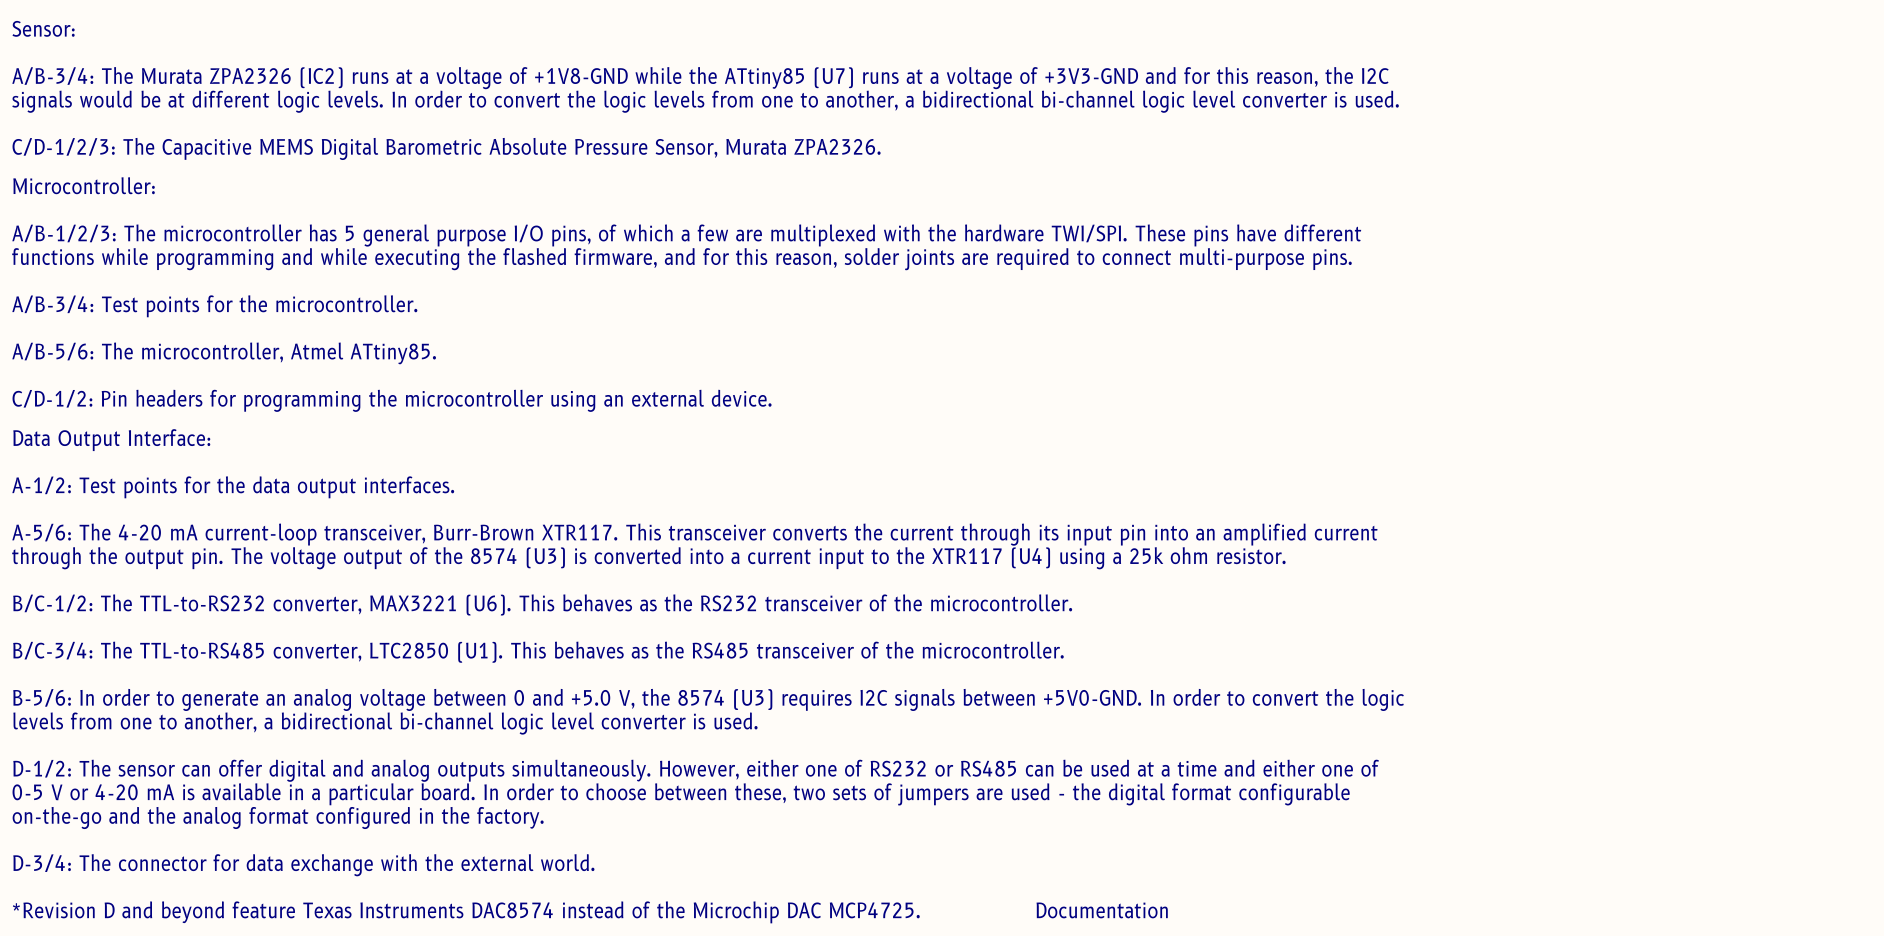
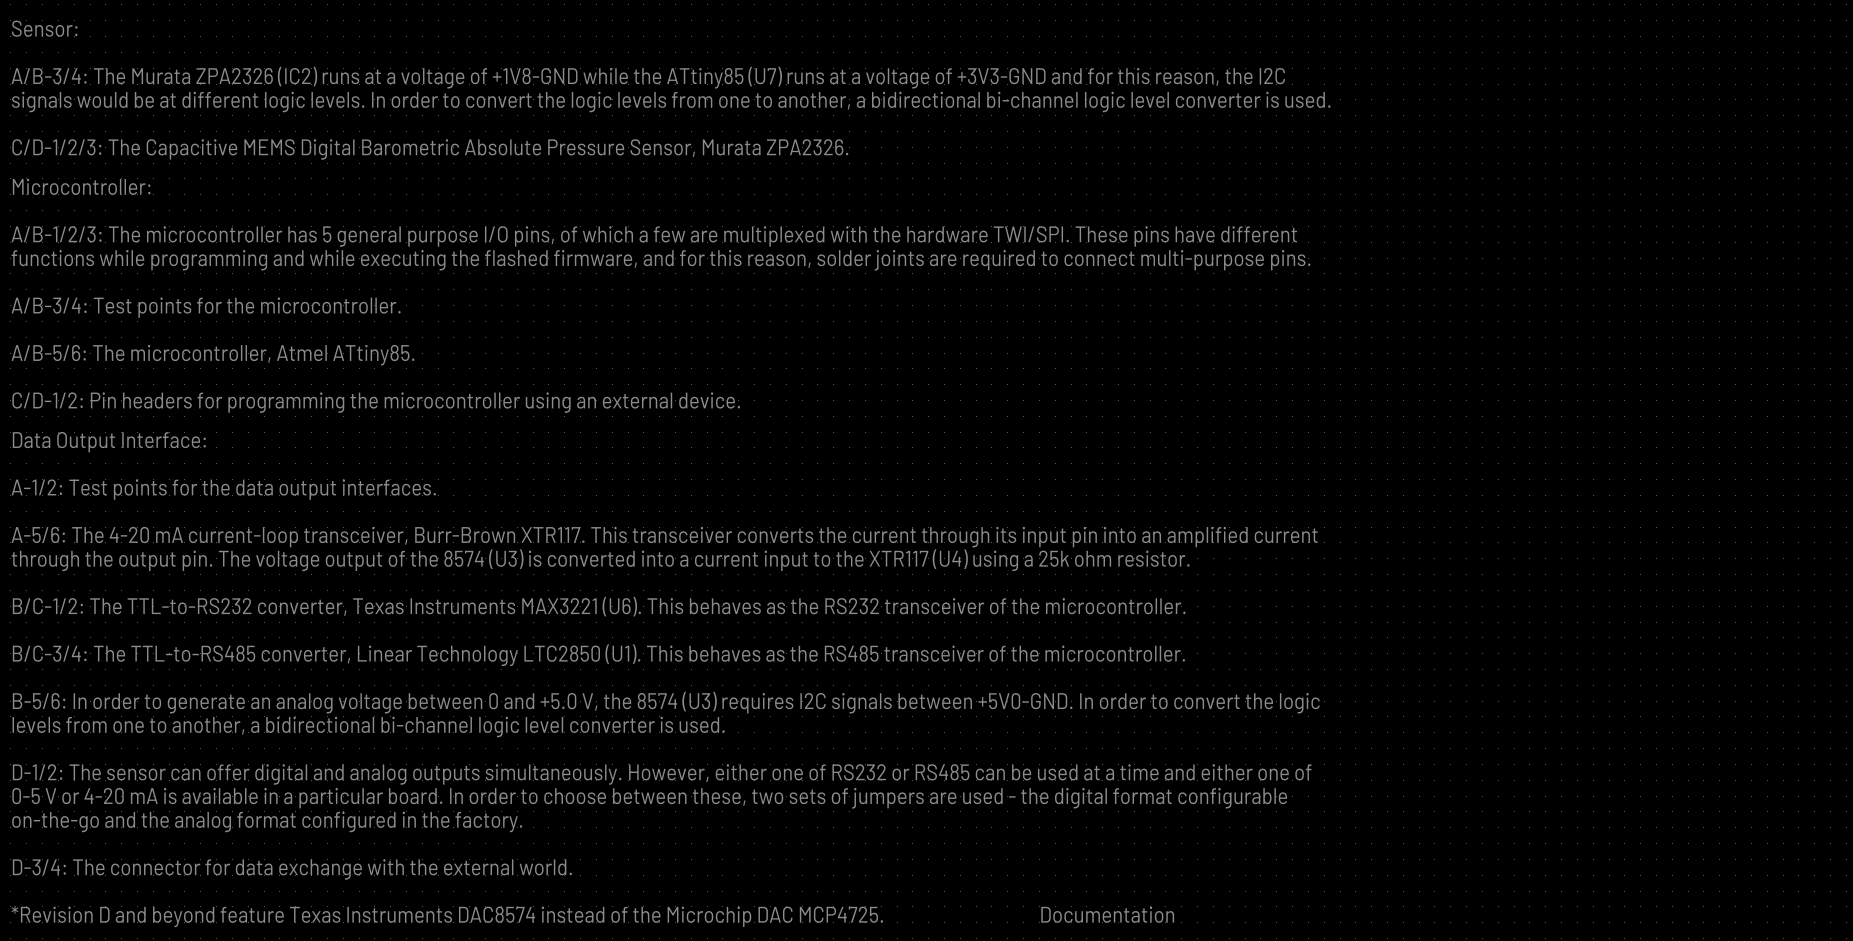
text: B/C-1/2: The TTL-to-RS232 converter, MAX3221 (U6). This behaves as the RS232 transceiver of the microcontroller. (542, 604) -> B/C-1/2: The TTL-to-RS232 converter, Texas Instruments MAX3221 (U6). This behaves as the RS232 transceiver of the microcontroller. (599, 606)
text: B/C-3/4: The TTL-to-RS485 converter, LTC2850 (U1). This behaves as the RS485 transceiver of the microcontroller. (538, 652) -> B/C-3/4: The TTL-to-RS485 converter, Linear Technology LTC2850 (U1). This behaves as the RS485 transceiver of the microcontroller. (598, 655)

